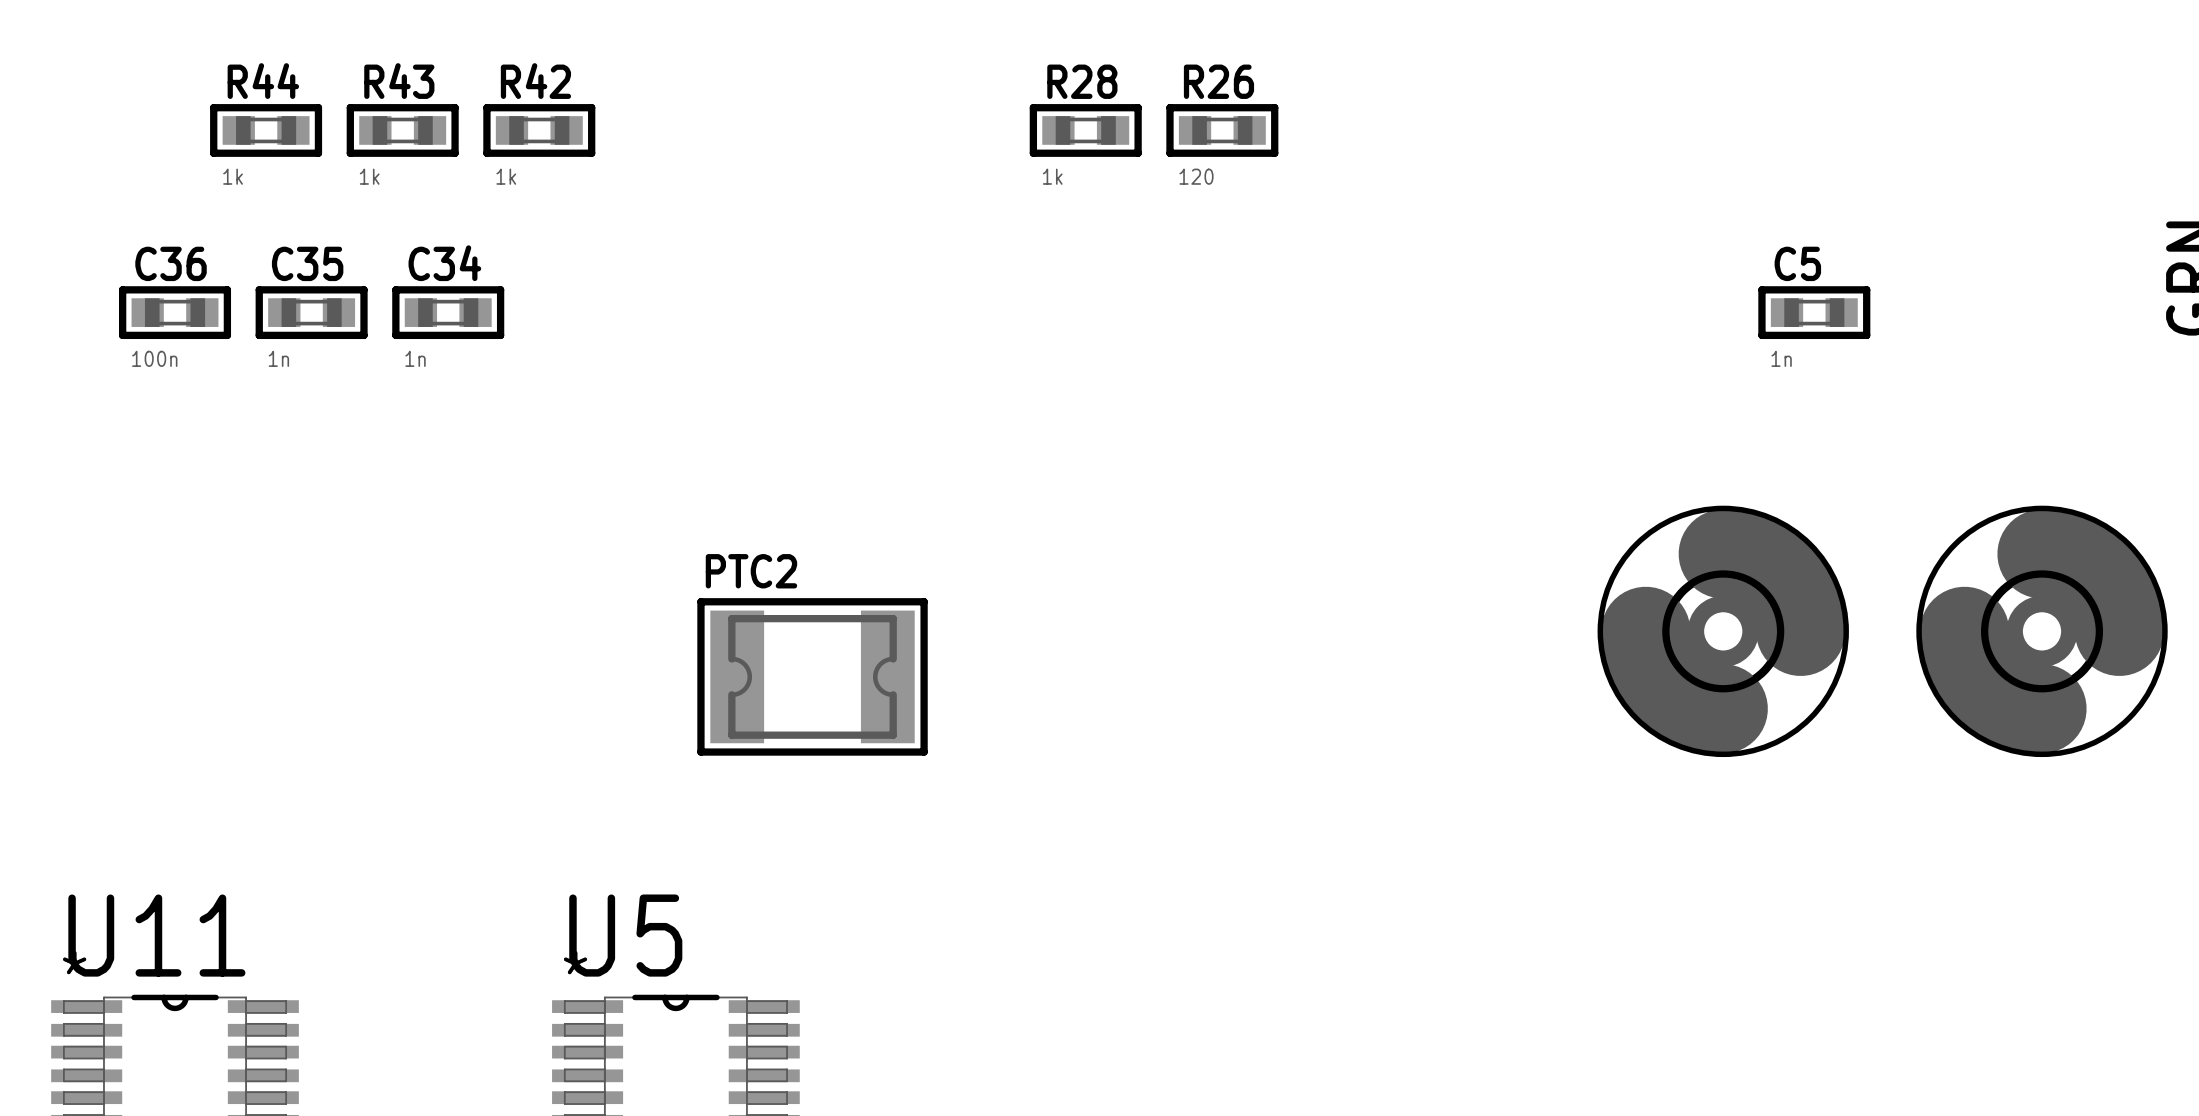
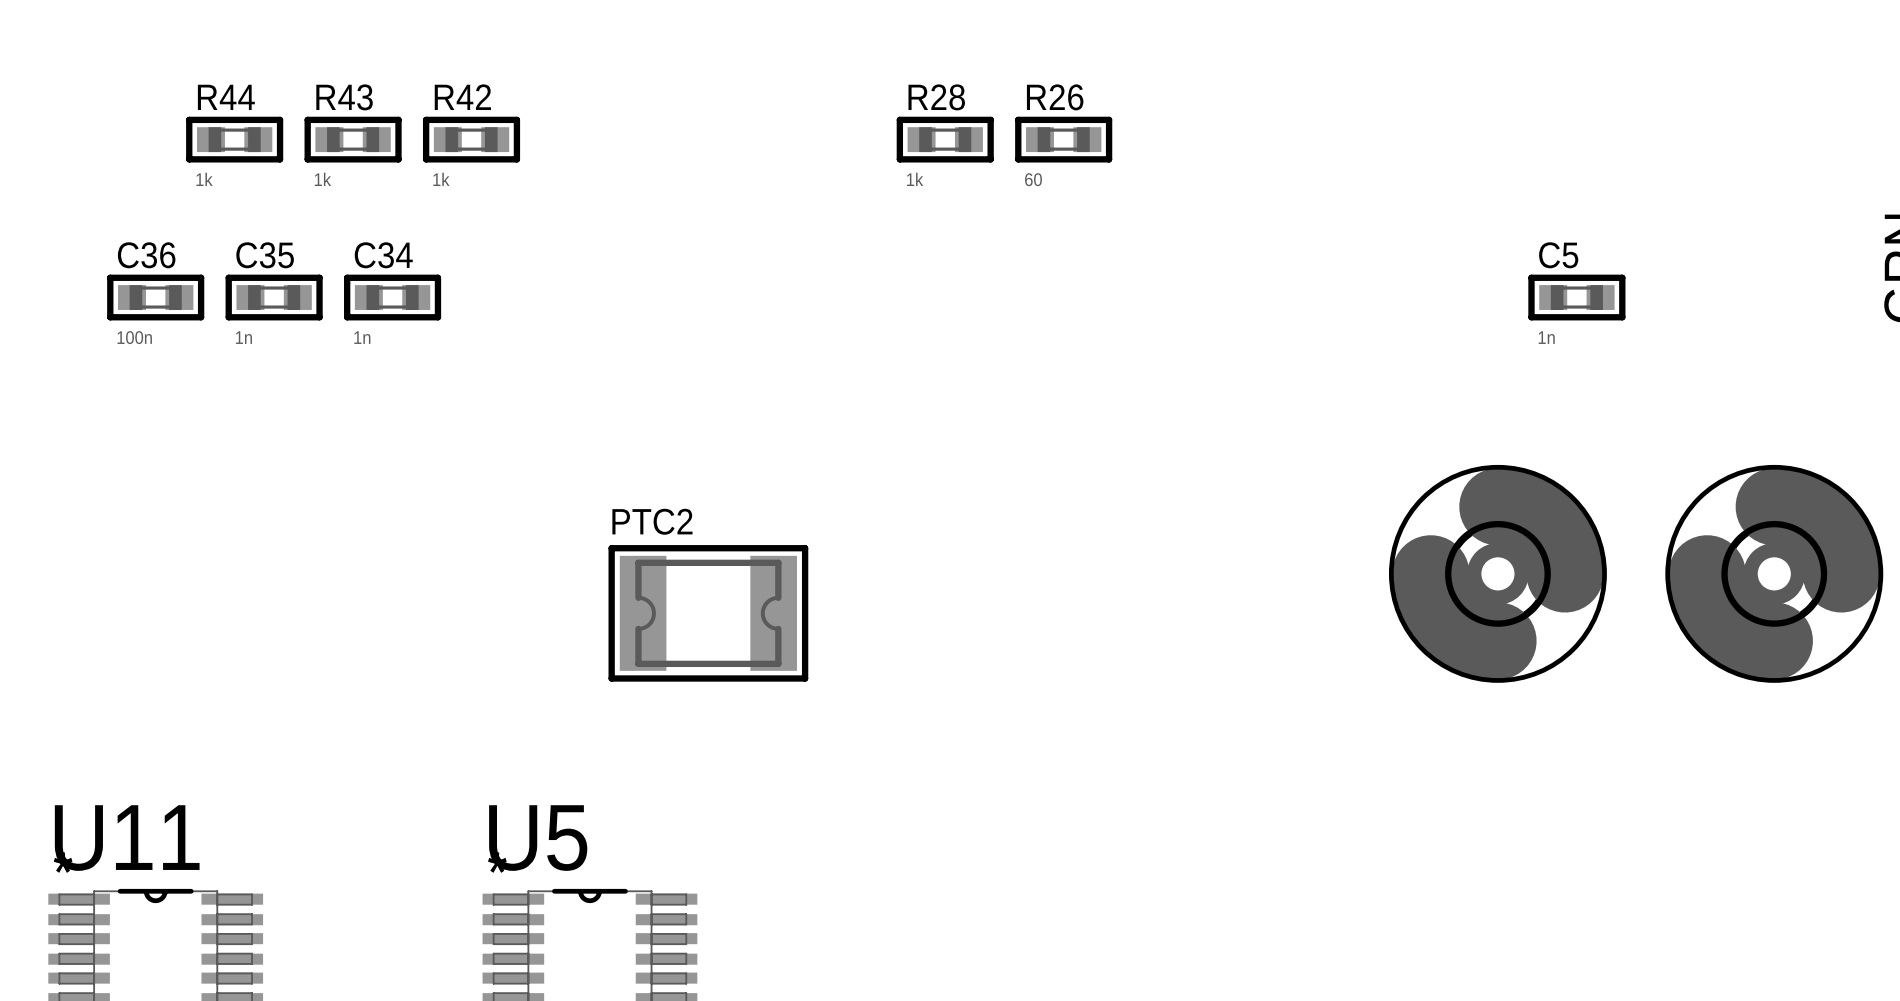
R26 value: 120 (1196, 176) -> 60 (1033, 179)

